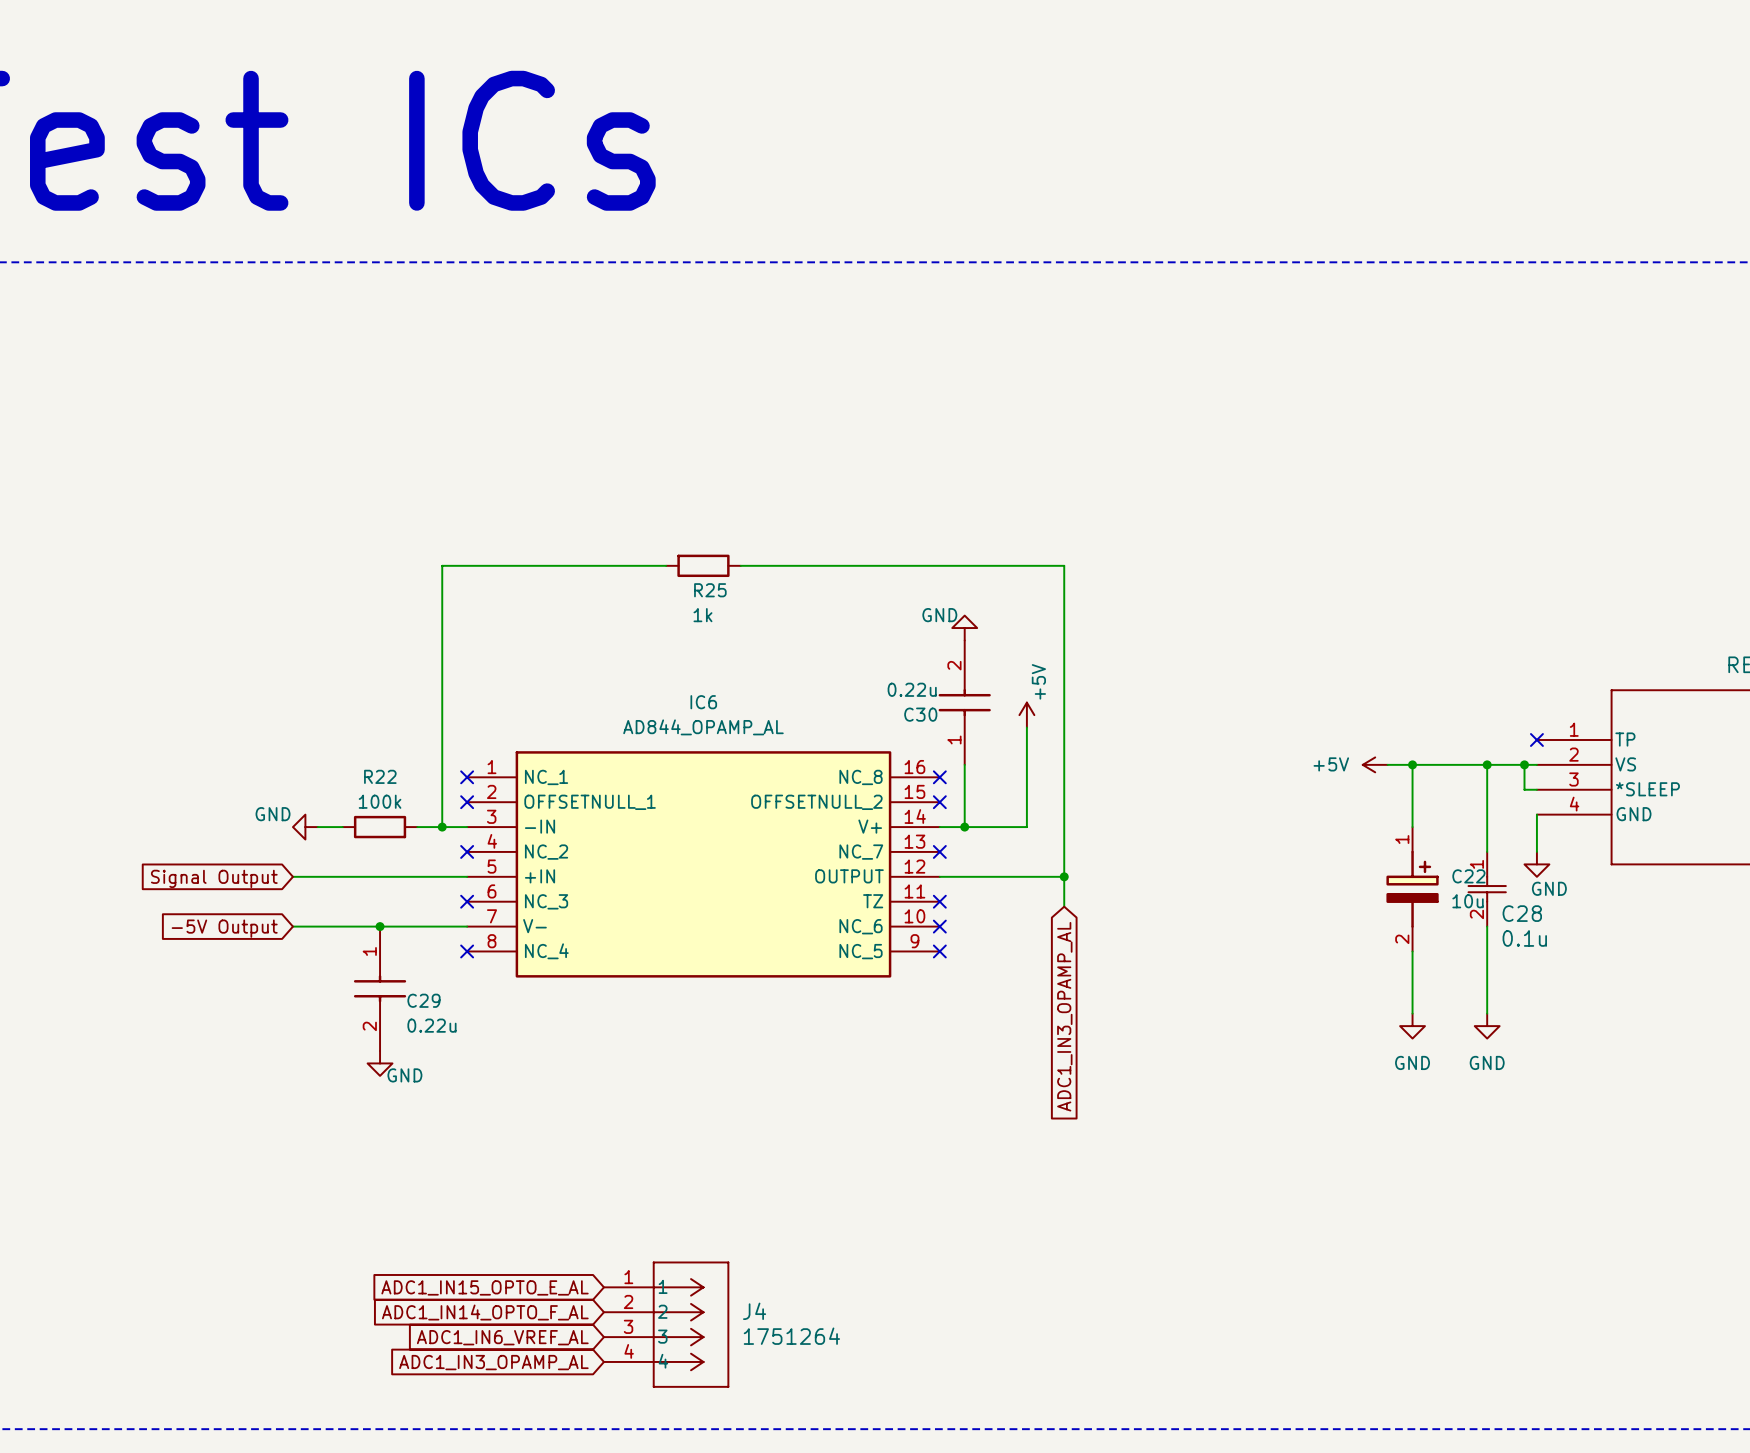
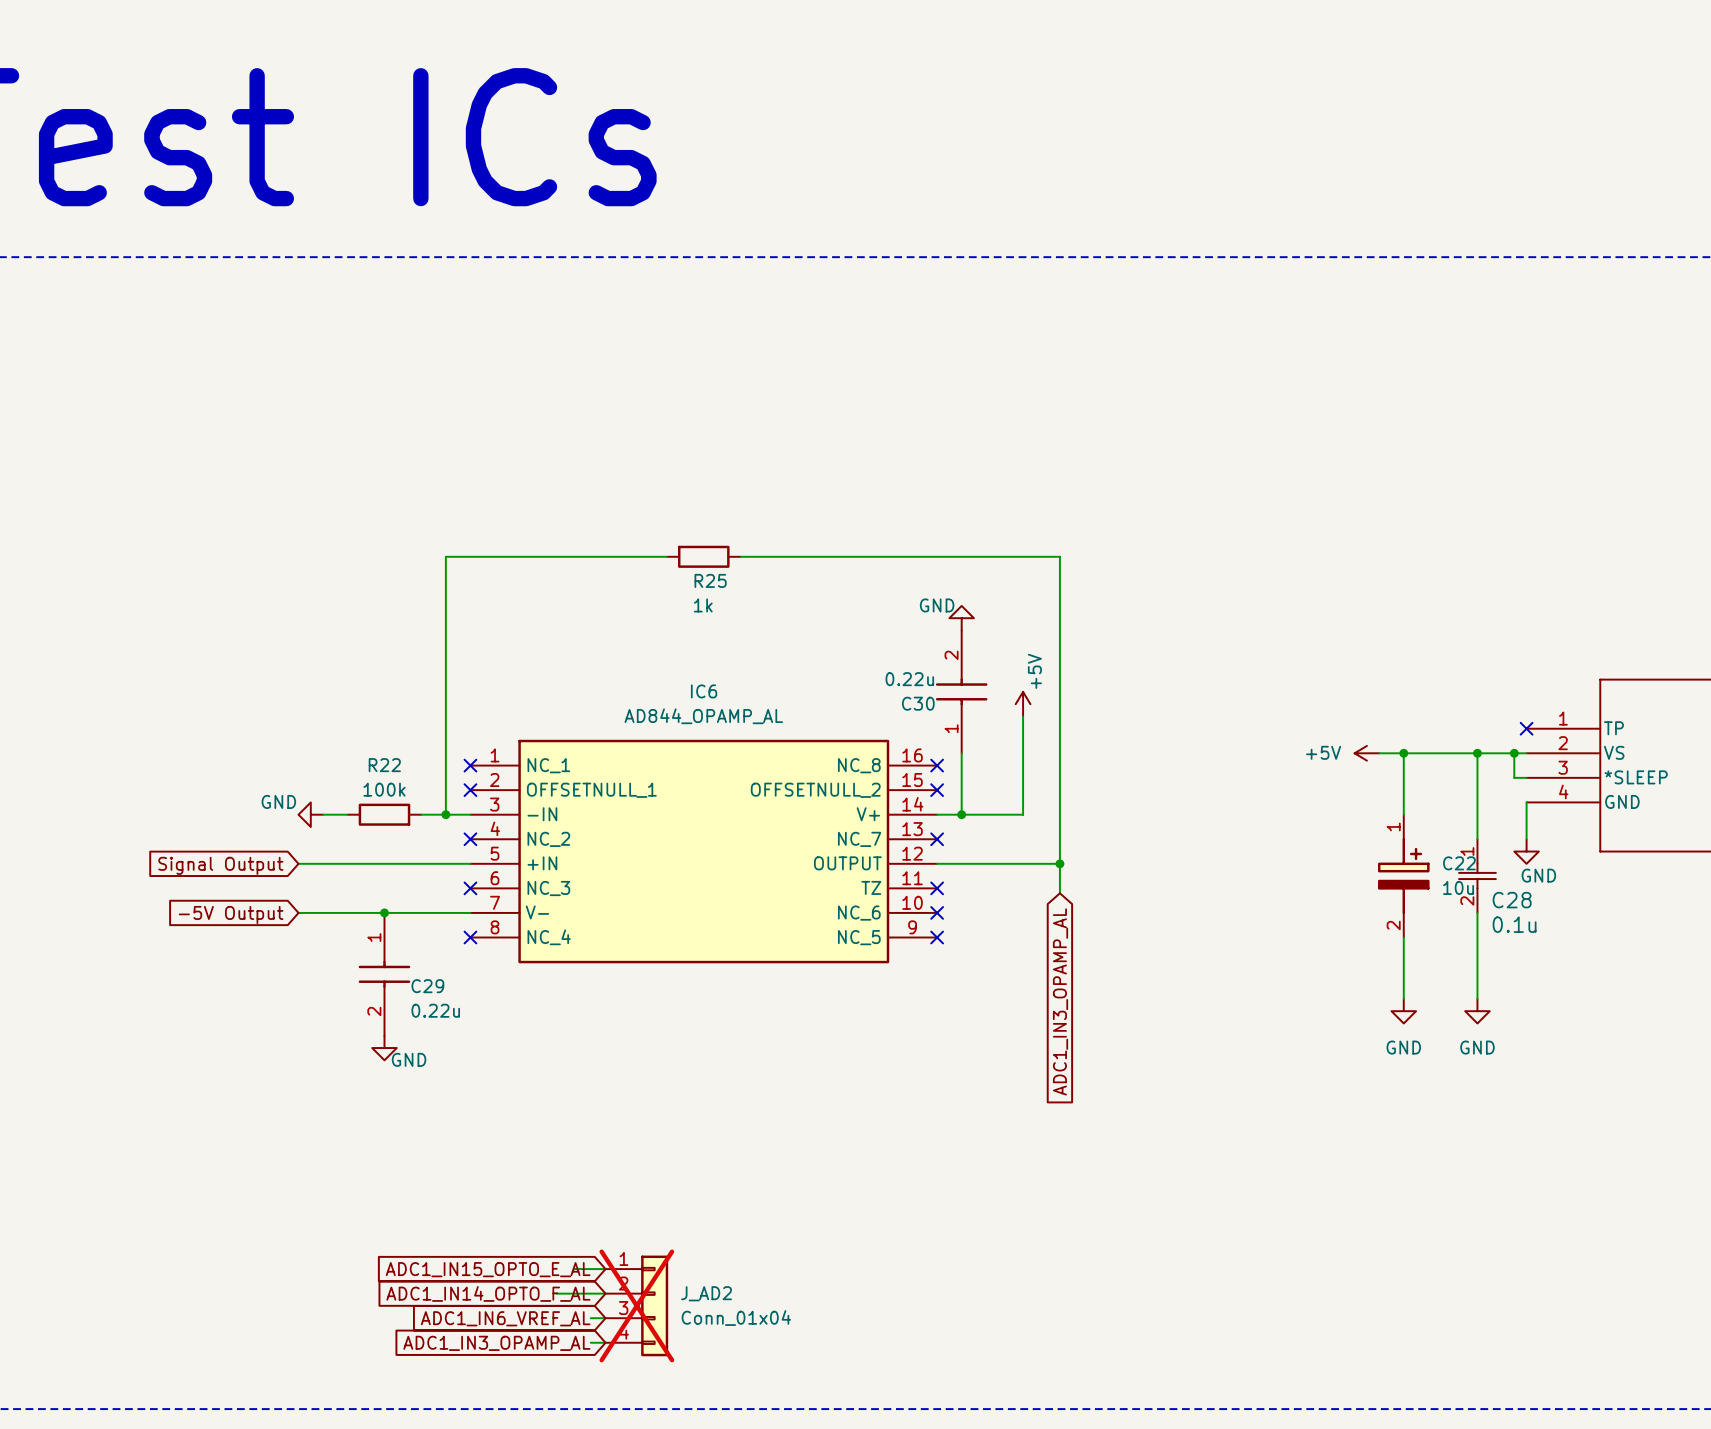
wire: none -> (573, 1269) (605, 1269)
wire: none -> (556, 1293) (605, 1293)
J_AD2: none -> Conn_01x04 (636, 1305)
J4: 1751264 (666, 1324) -> none
wire: none -> (590, 1318) (605, 1318)
wire: none -> (590, 1342) (605, 1342)

